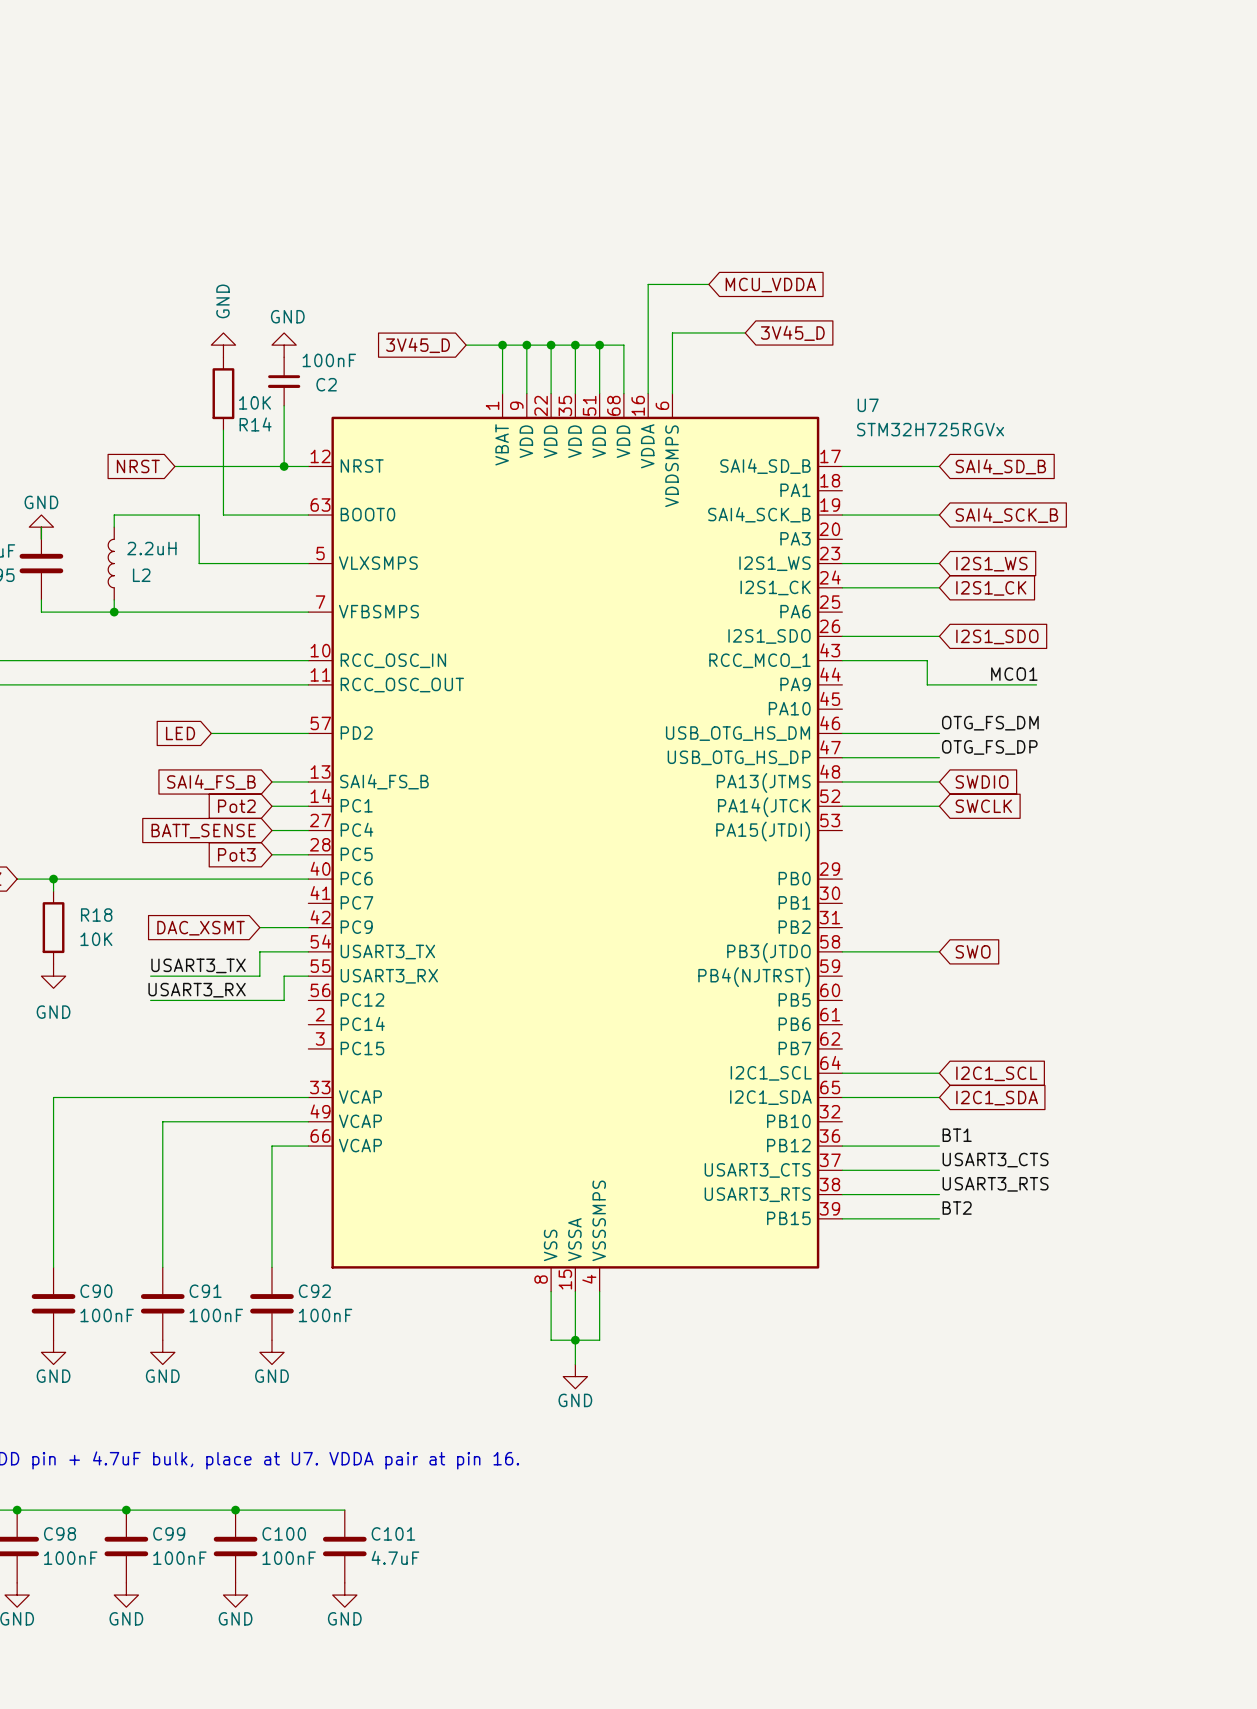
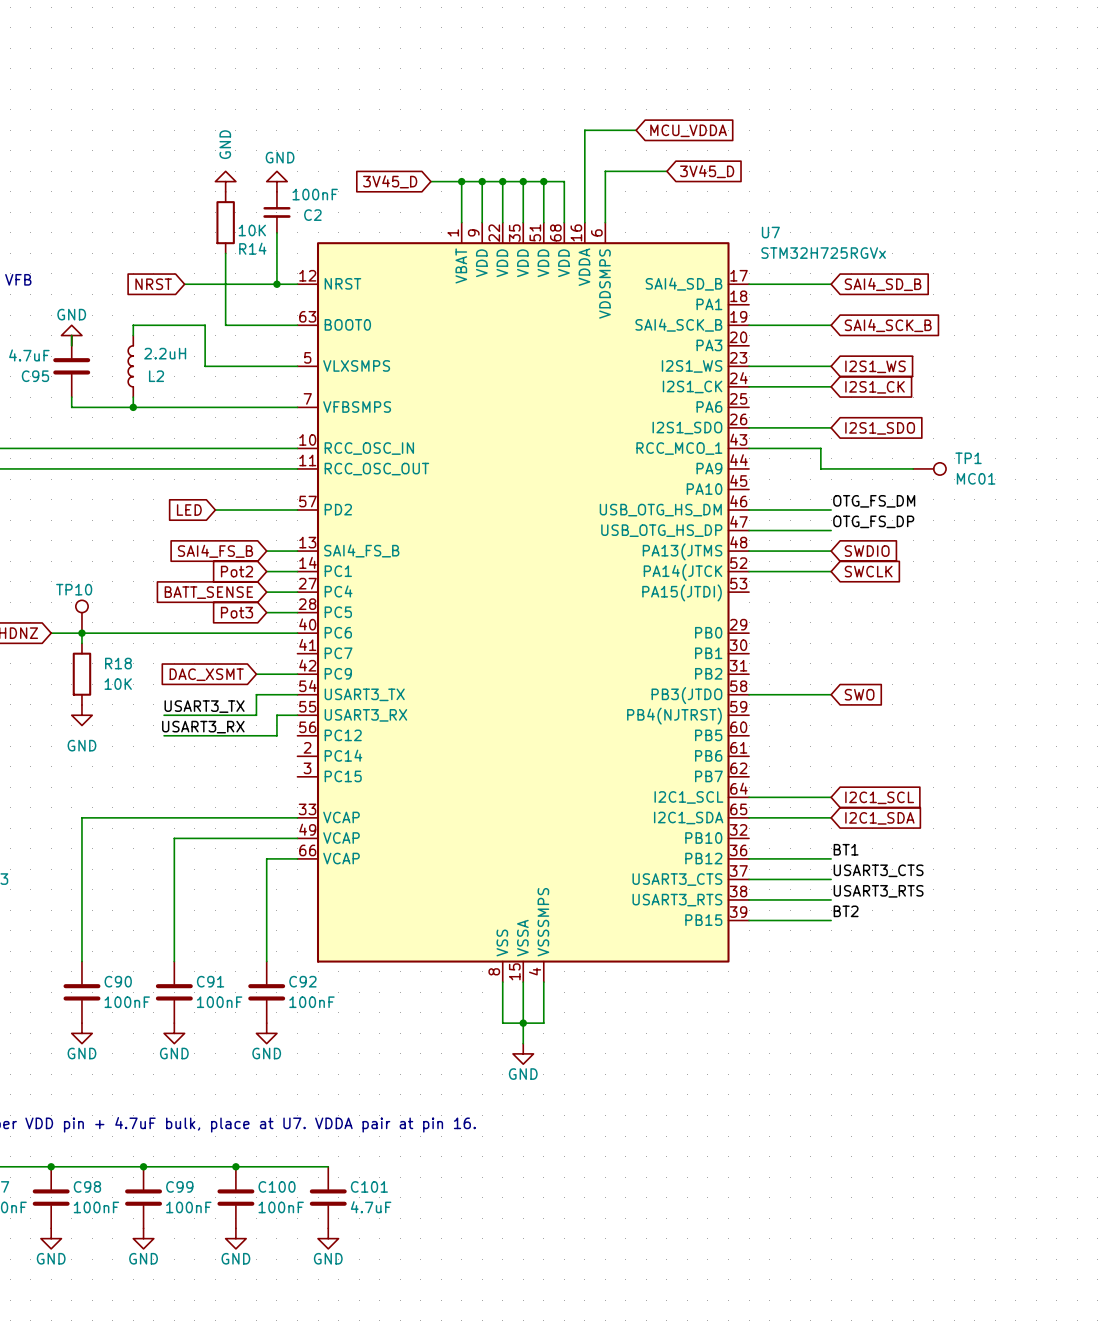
label: MCO1 (1014, 674) -> none
TP1: none -> MC01 (929, 468)
TP10: none -> (81, 616)

